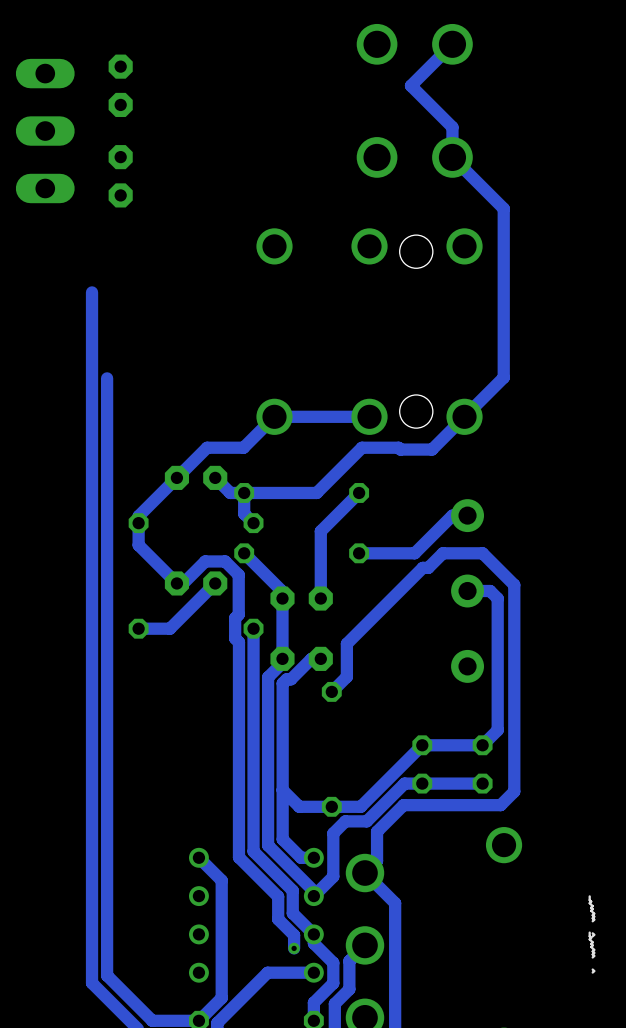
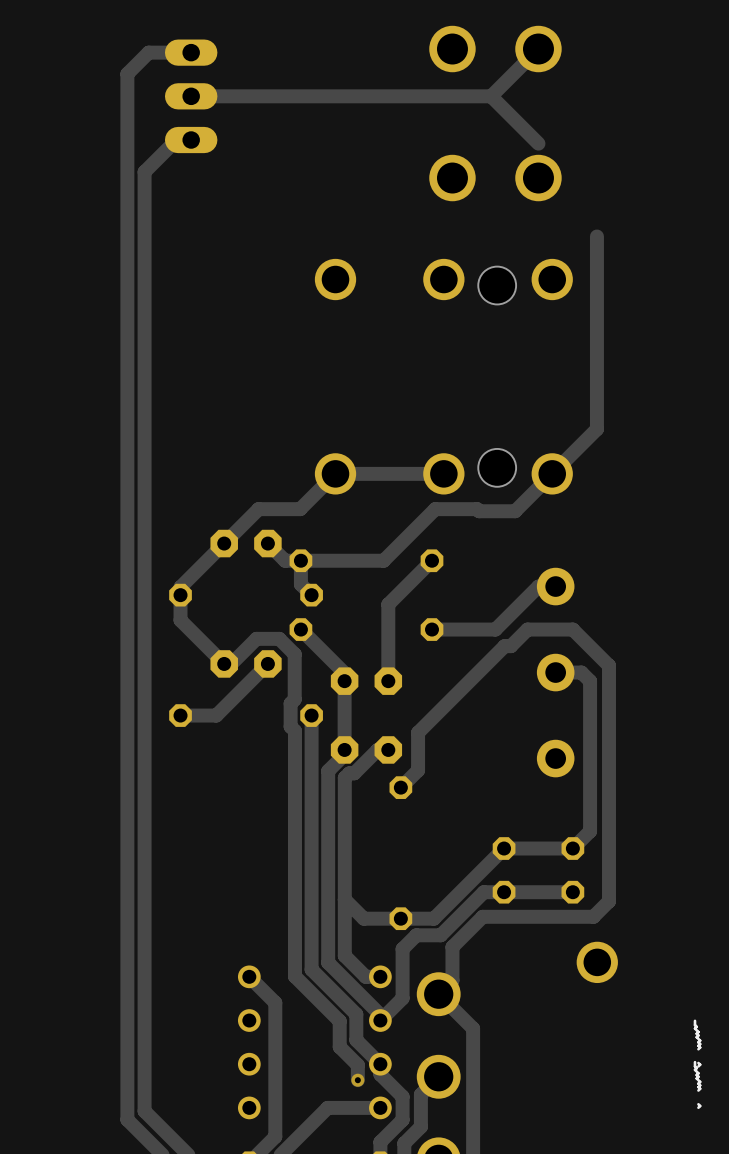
track: none -> (191, 52) (148, 52) (127, 73) (127, 331)
part: (120, 85) -> none
part: none -> (191, 96)
track: none -> (491, 96) (191, 96)
track: none -> (191, 140) (176, 140) (144, 172) (144, 430)
track: (452, 127) (452, 157) (503, 208) -> none
part: (45, 131) -> none
part: (120, 176) -> none

